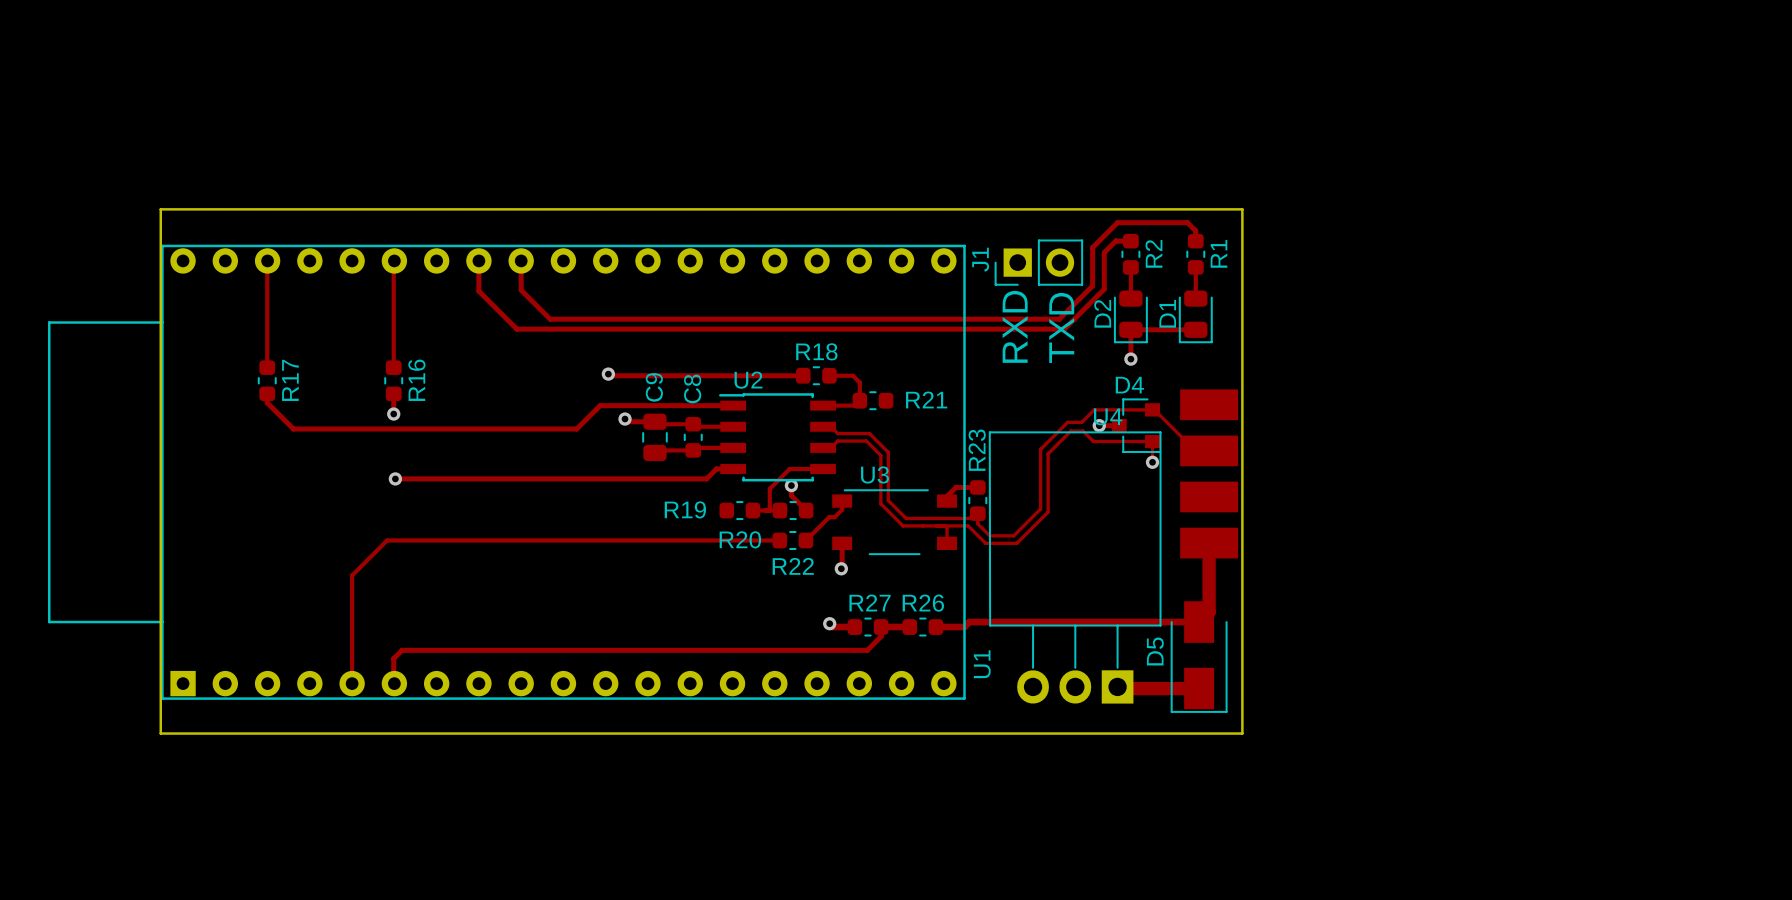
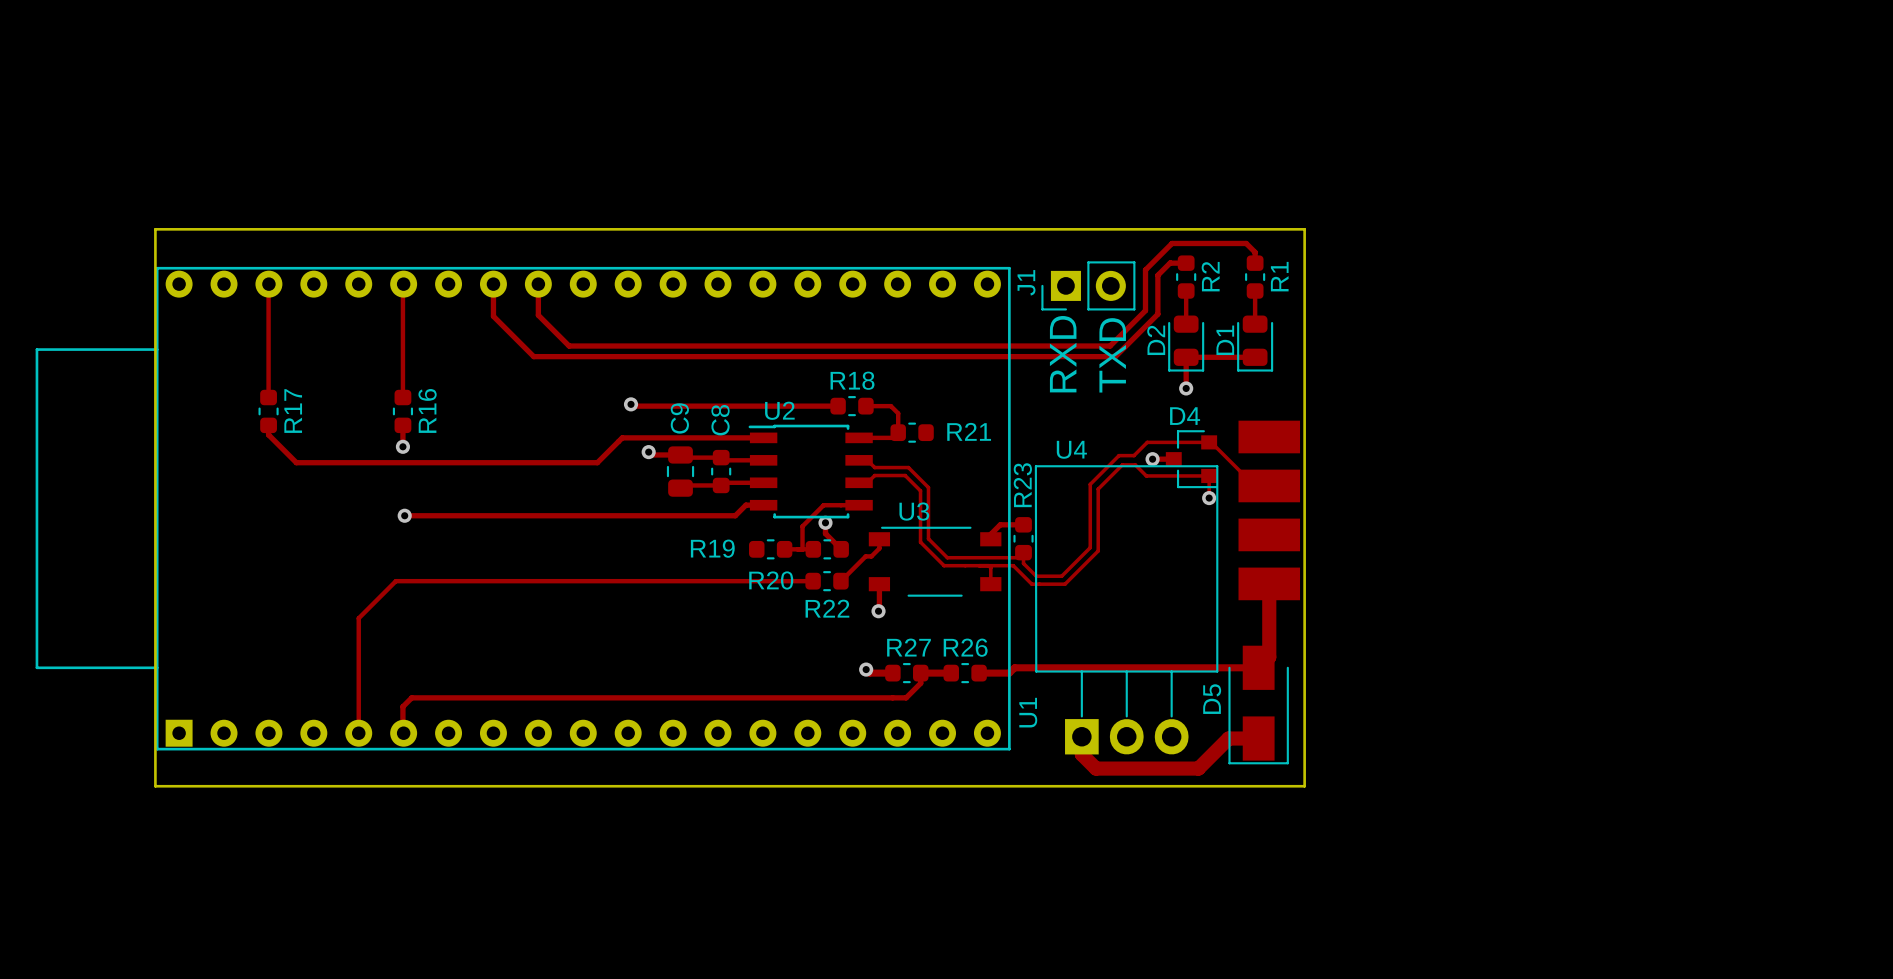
U4 name position: U4 (1108, 416) -> U4 (1071, 449)
U4 footprint: [988, 431, 1162, 704] -> [1034, 465, 1219, 755]
track: (1117, 686) (1115, 686) (1117, 688) (1170, 688) -> (1081, 736) (1081, 754) (1096, 768) (1198, 768) (1228, 738)

